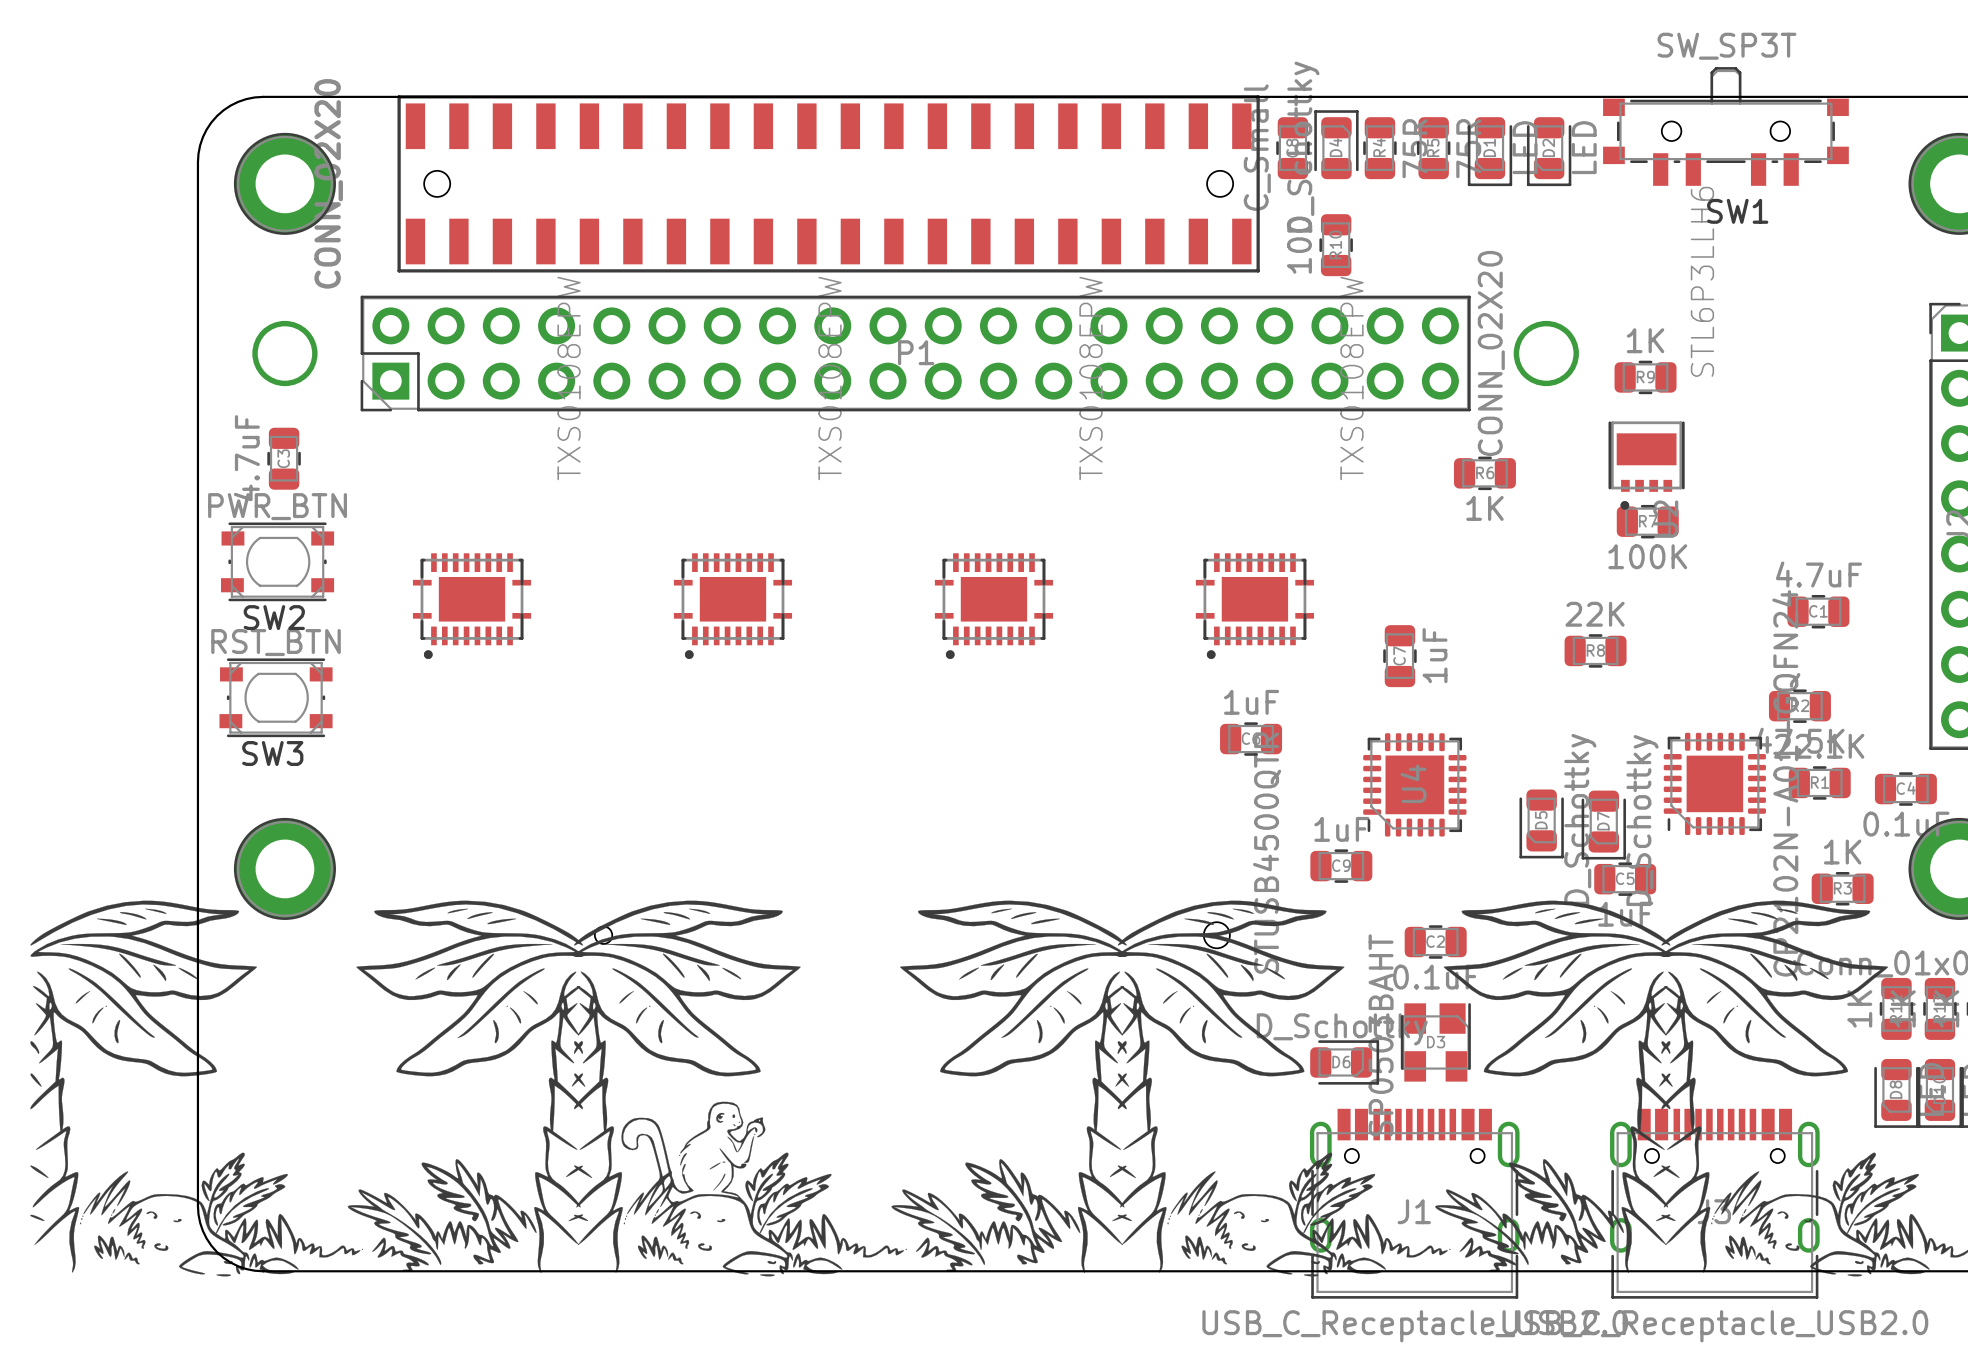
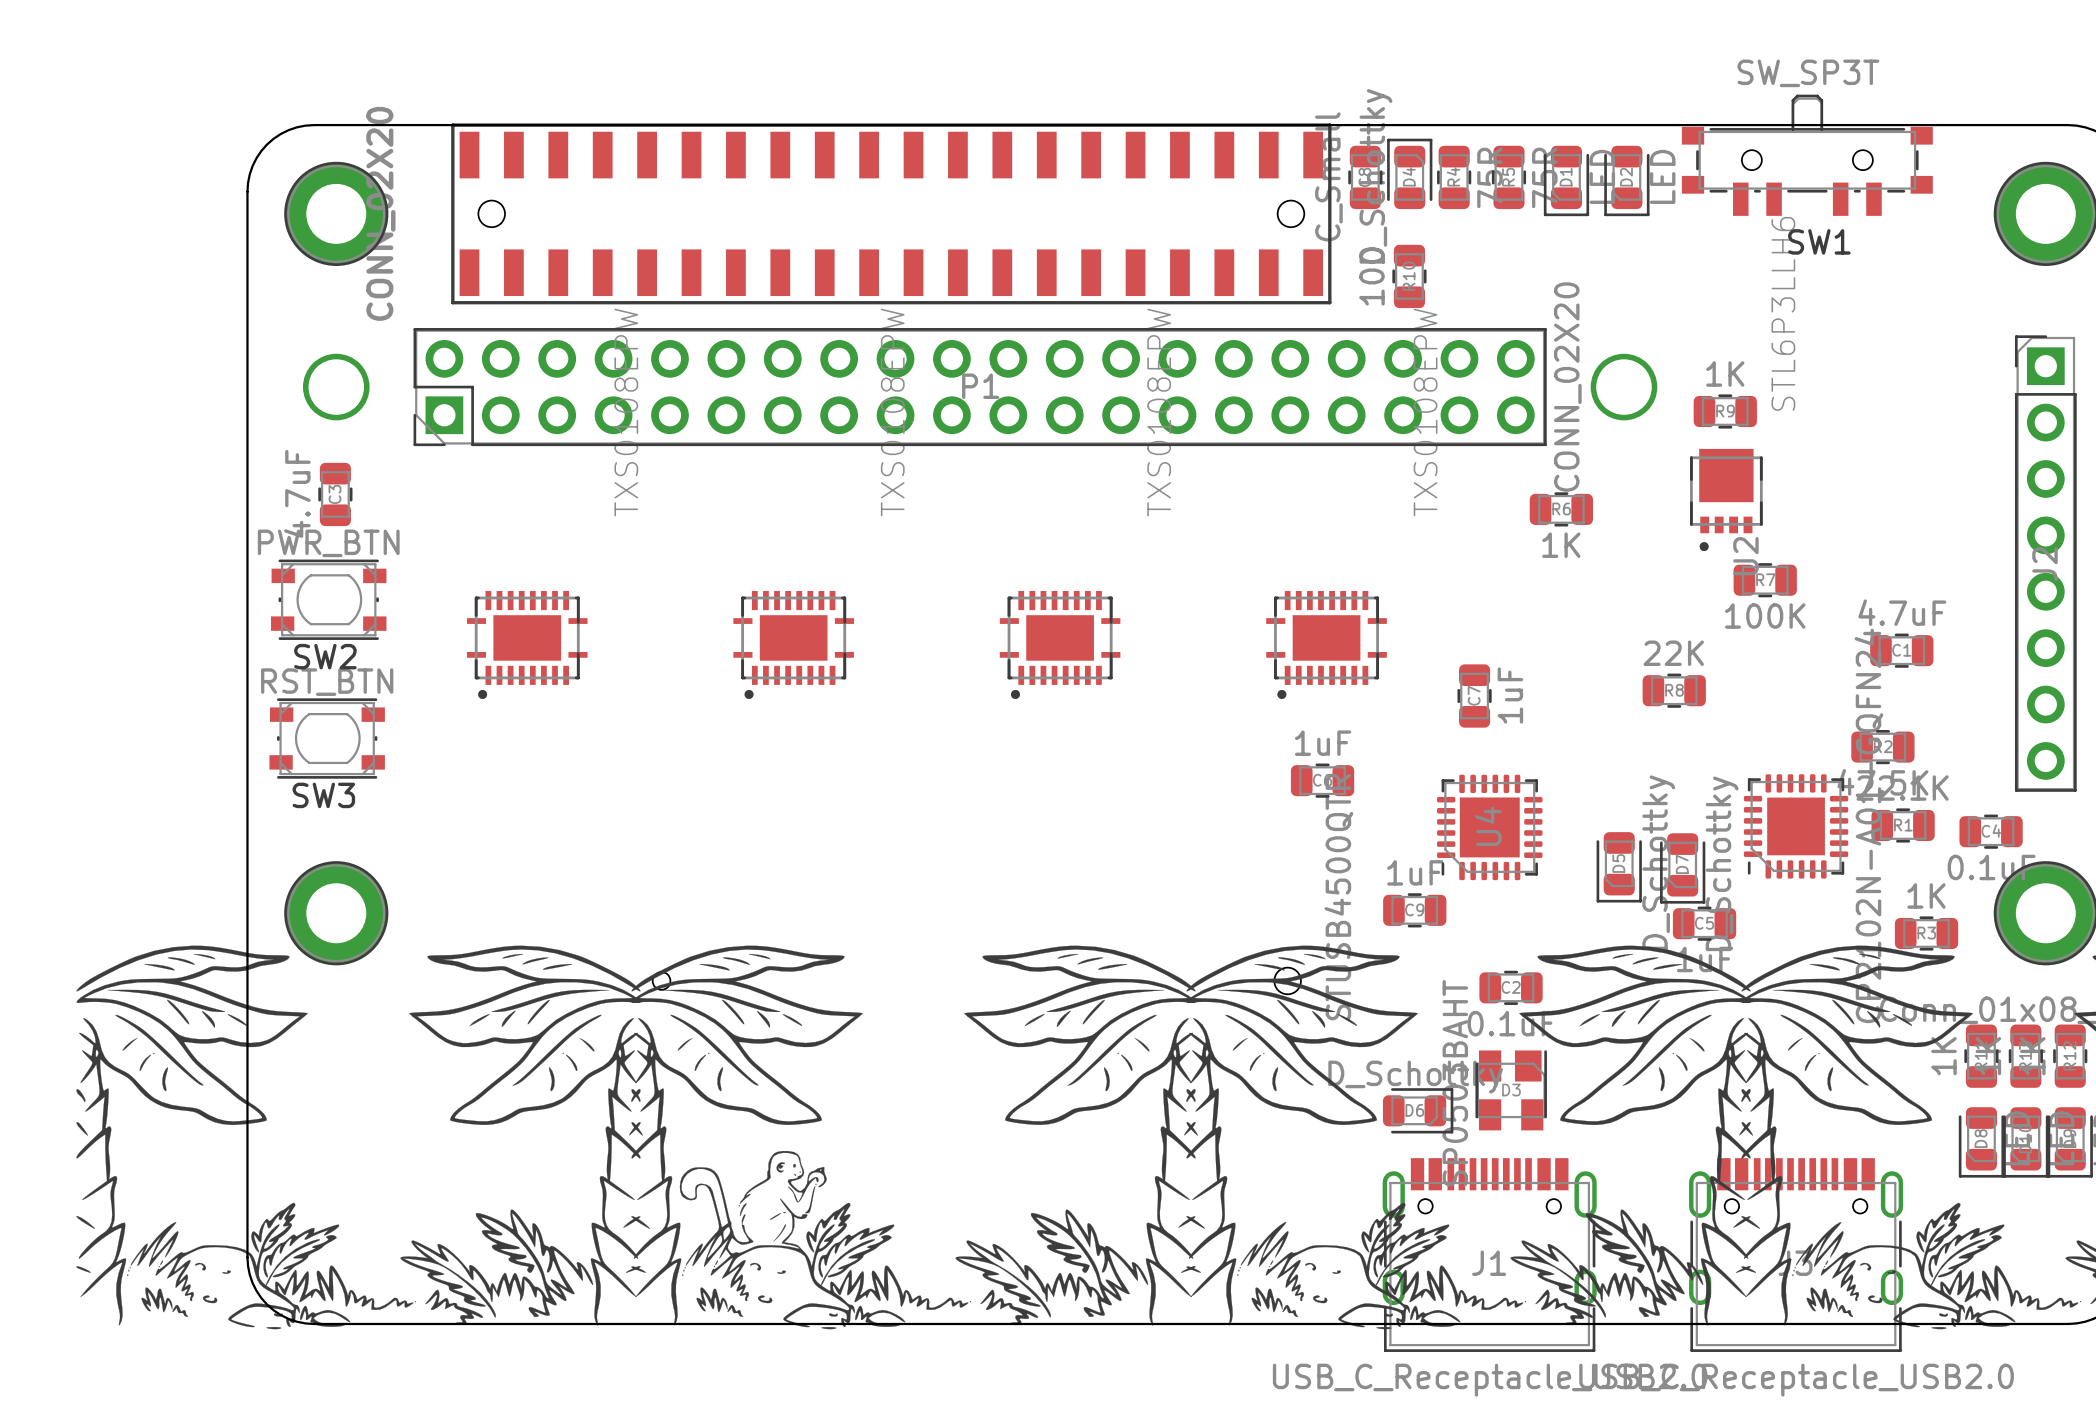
part footprint: [1608, 421, 1685, 510] -> [1690, 448, 1763, 552]
R7 position: (1647, 521) -> (1765, 580)

